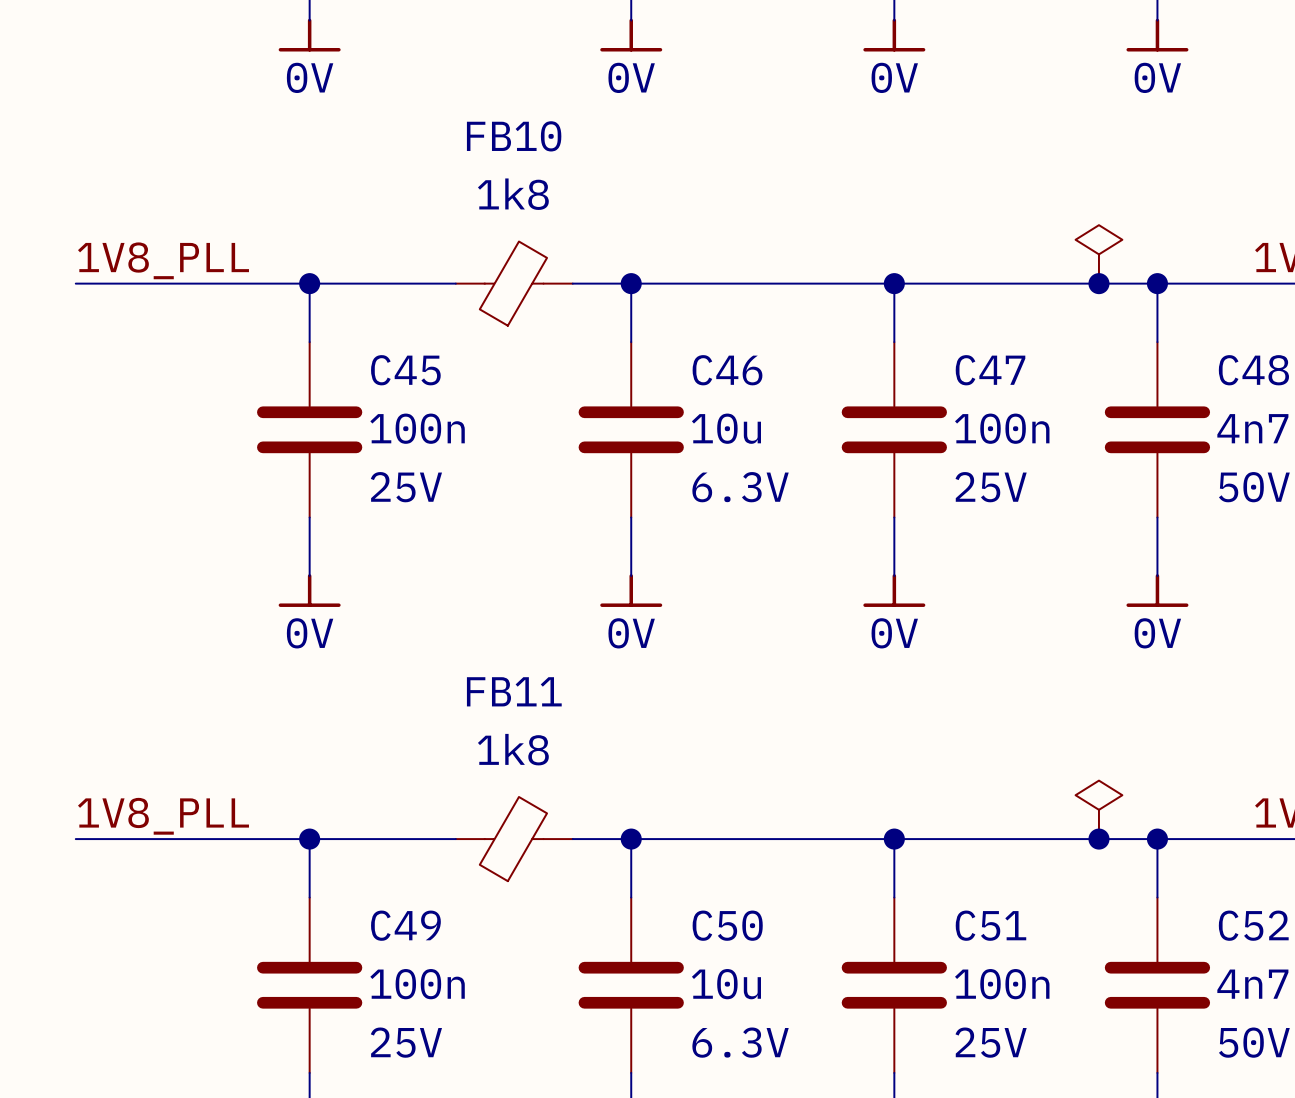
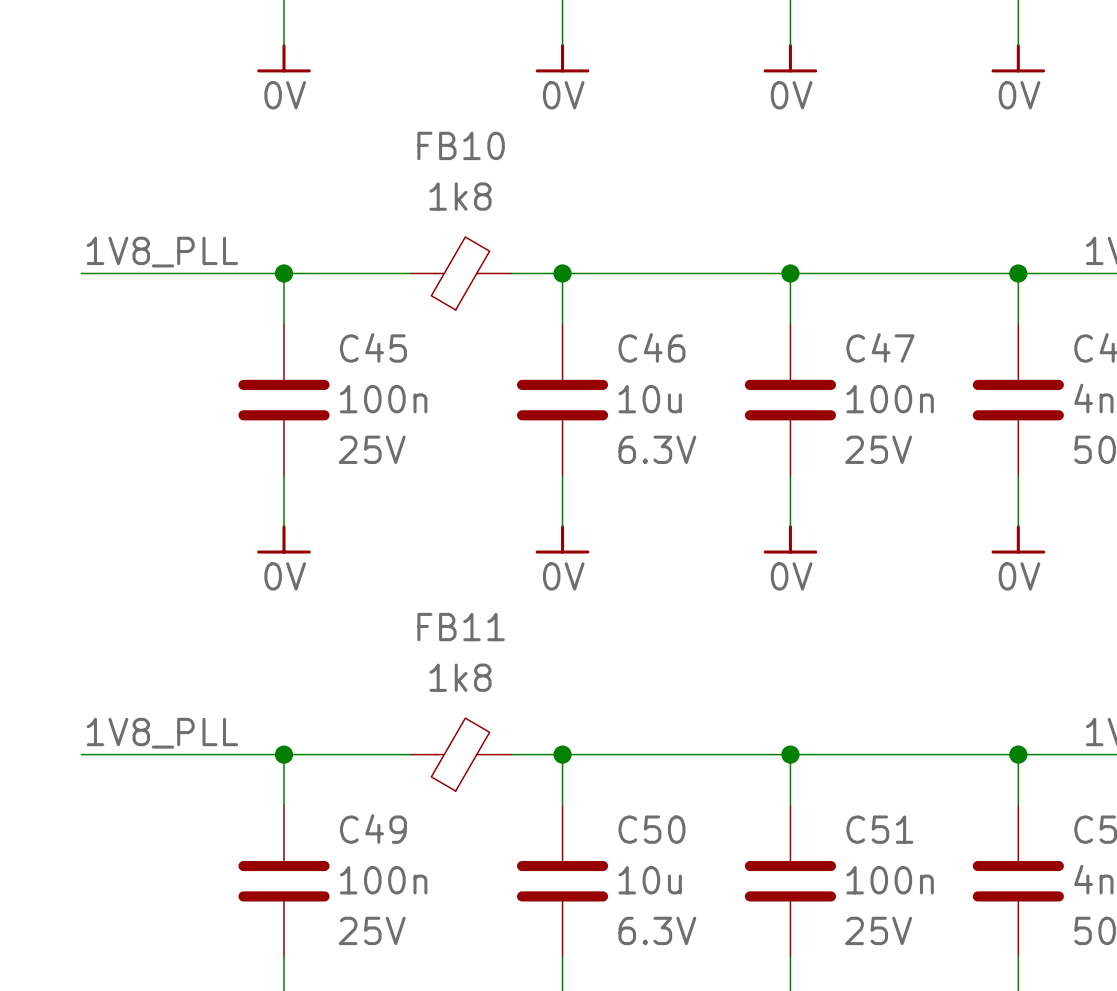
power symbol: (1098, 254) -> none
junction: (1098, 283) -> none
power symbol: (1098, 809) -> none
junction: (1098, 839) -> none

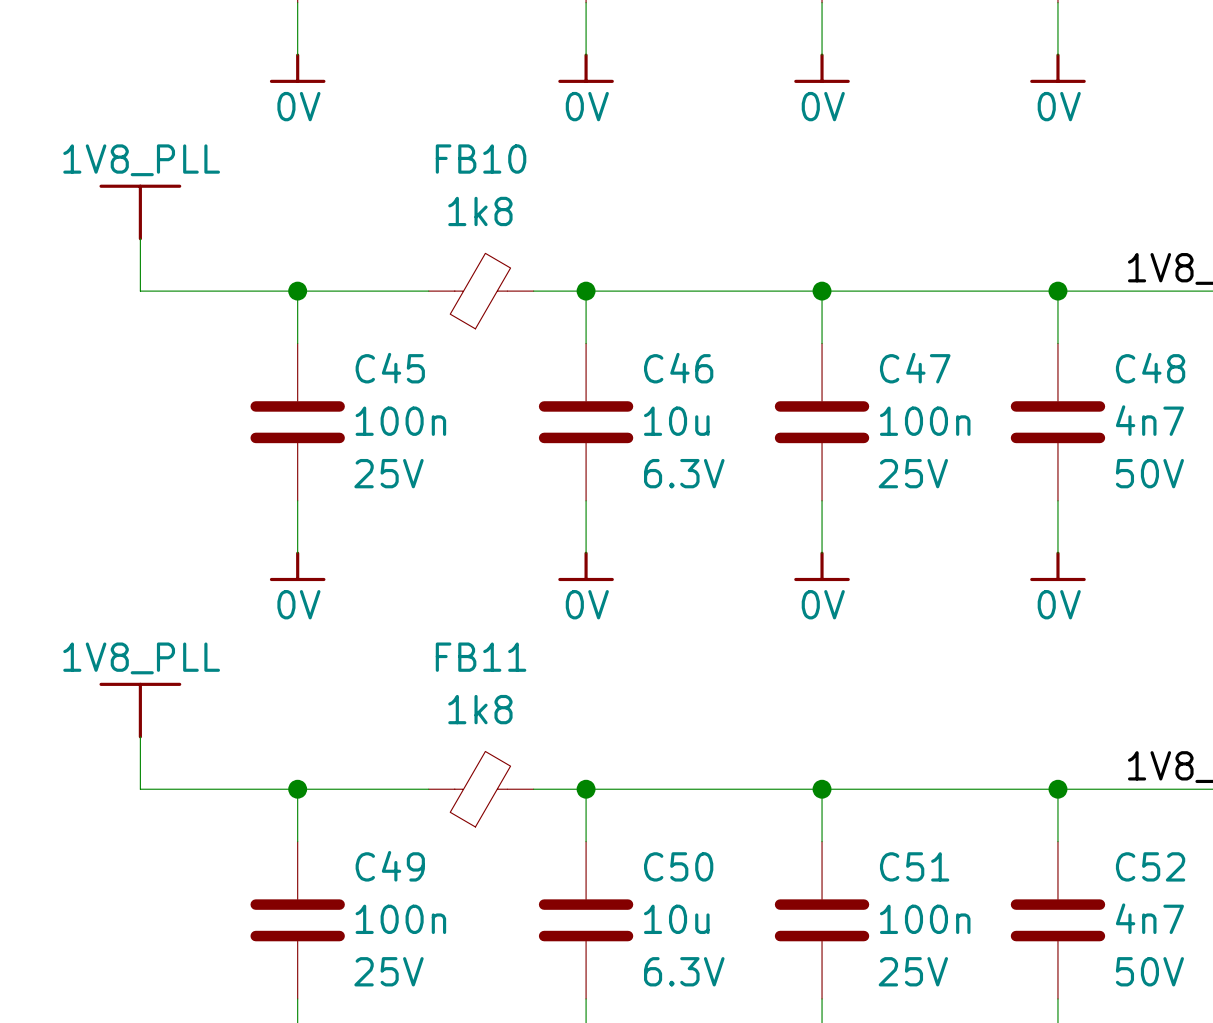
power symbol: none -> 1V8_PLL (140, 212)
label: 1V8_PLL (162, 252) -> none
wire: (81, 273) (132, 273) -> (140, 238) (140, 291)
power symbol: none -> 1V8_PLL (140, 710)
label: 1V8_PLL (162, 733) -> none
wire: (81, 754) (132, 754) -> (140, 736) (140, 789)

